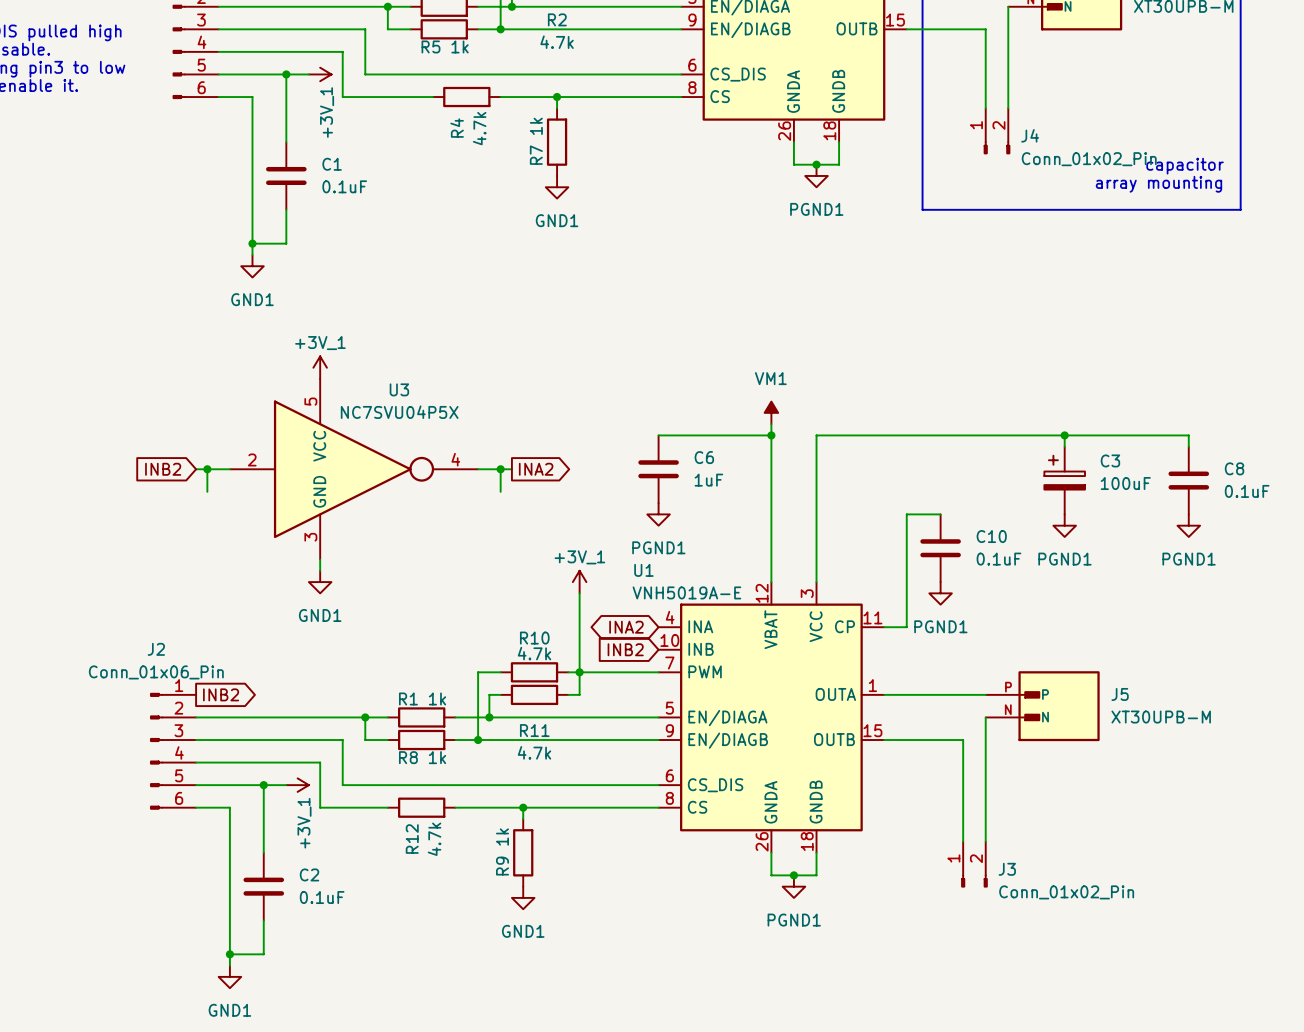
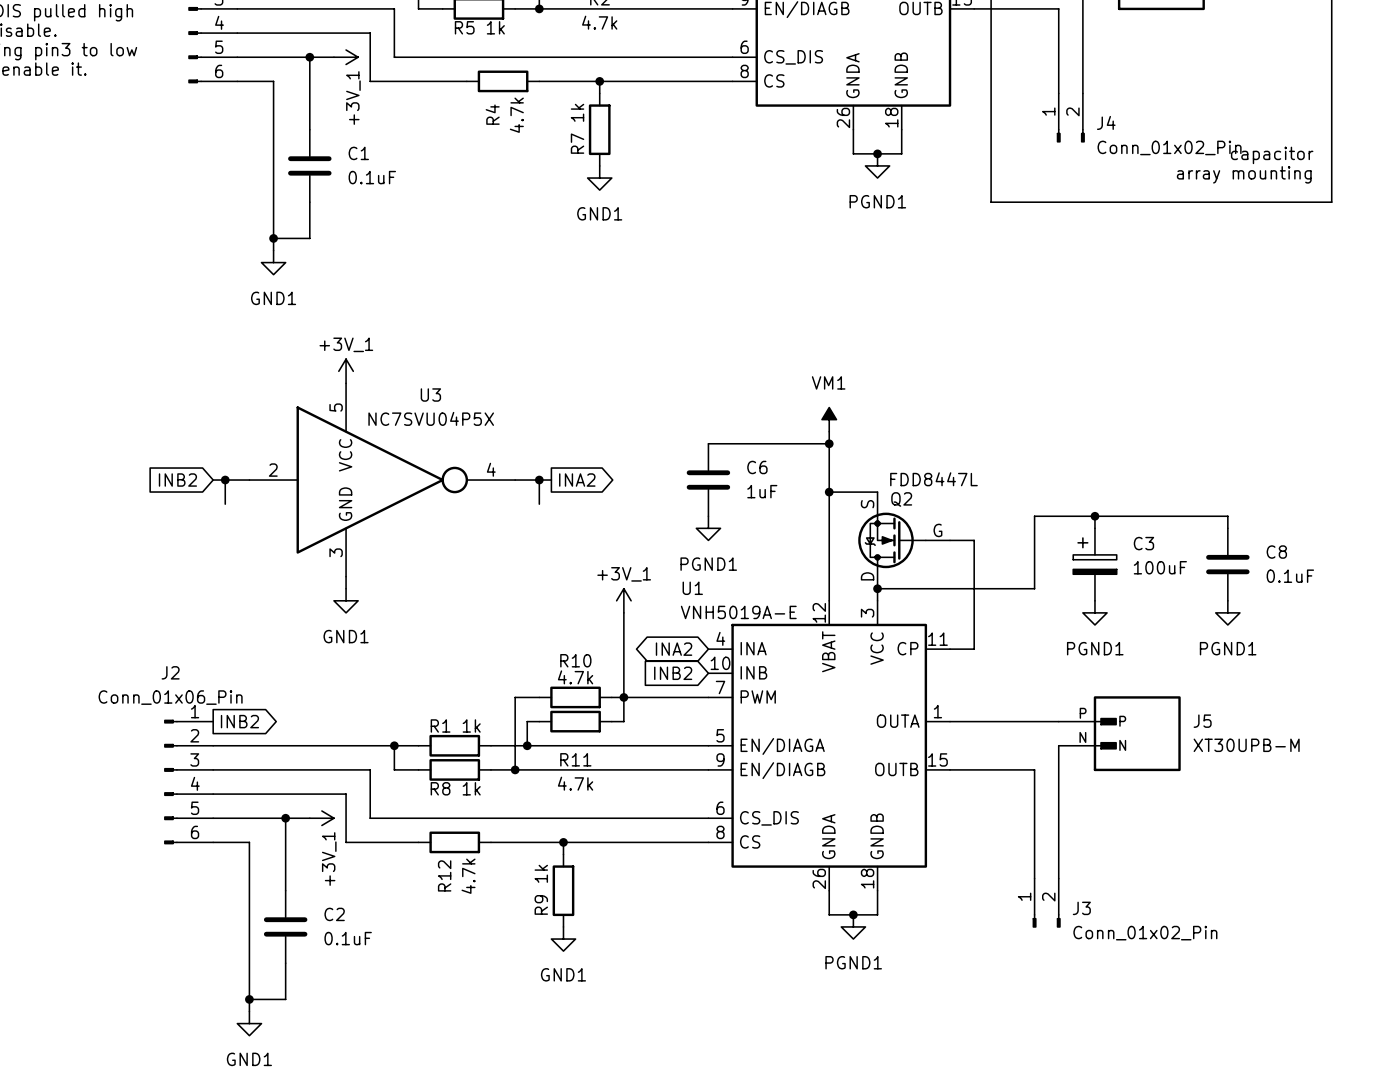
wire: (1064, 435) (1064, 446) -> (1094, 516) (1094, 528)
junction: (1064, 435) -> none
wire: (1188, 446) (1188, 435) (816, 435) (816, 570) -> (1227, 528) (1227, 516) (1034, 516) (1034, 588) (877, 588)
wire: none -> (829, 492) (877, 492)
junction: none -> (829, 492)
C3 position: (1064, 480) -> (1094, 564)
C8 position: (1188, 480) -> (1227, 564)
junction: none -> (1094, 516)
wire: (940, 514) (906, 514) (906, 525) -> (950, 540) (974, 540)
Q2: none -> FDD8447L (904, 540)
power symbol: PGND1 (1064, 525) -> none
power symbol: PGND1 (1188, 525) -> none
C10: 0.1uF (940, 548) -> none
junction: none -> (877, 588)
power symbol: PGND1 (940, 593) -> none
power symbol: none -> PGND1 (1094, 612)
power symbol: none -> PGND1 (1227, 612)

